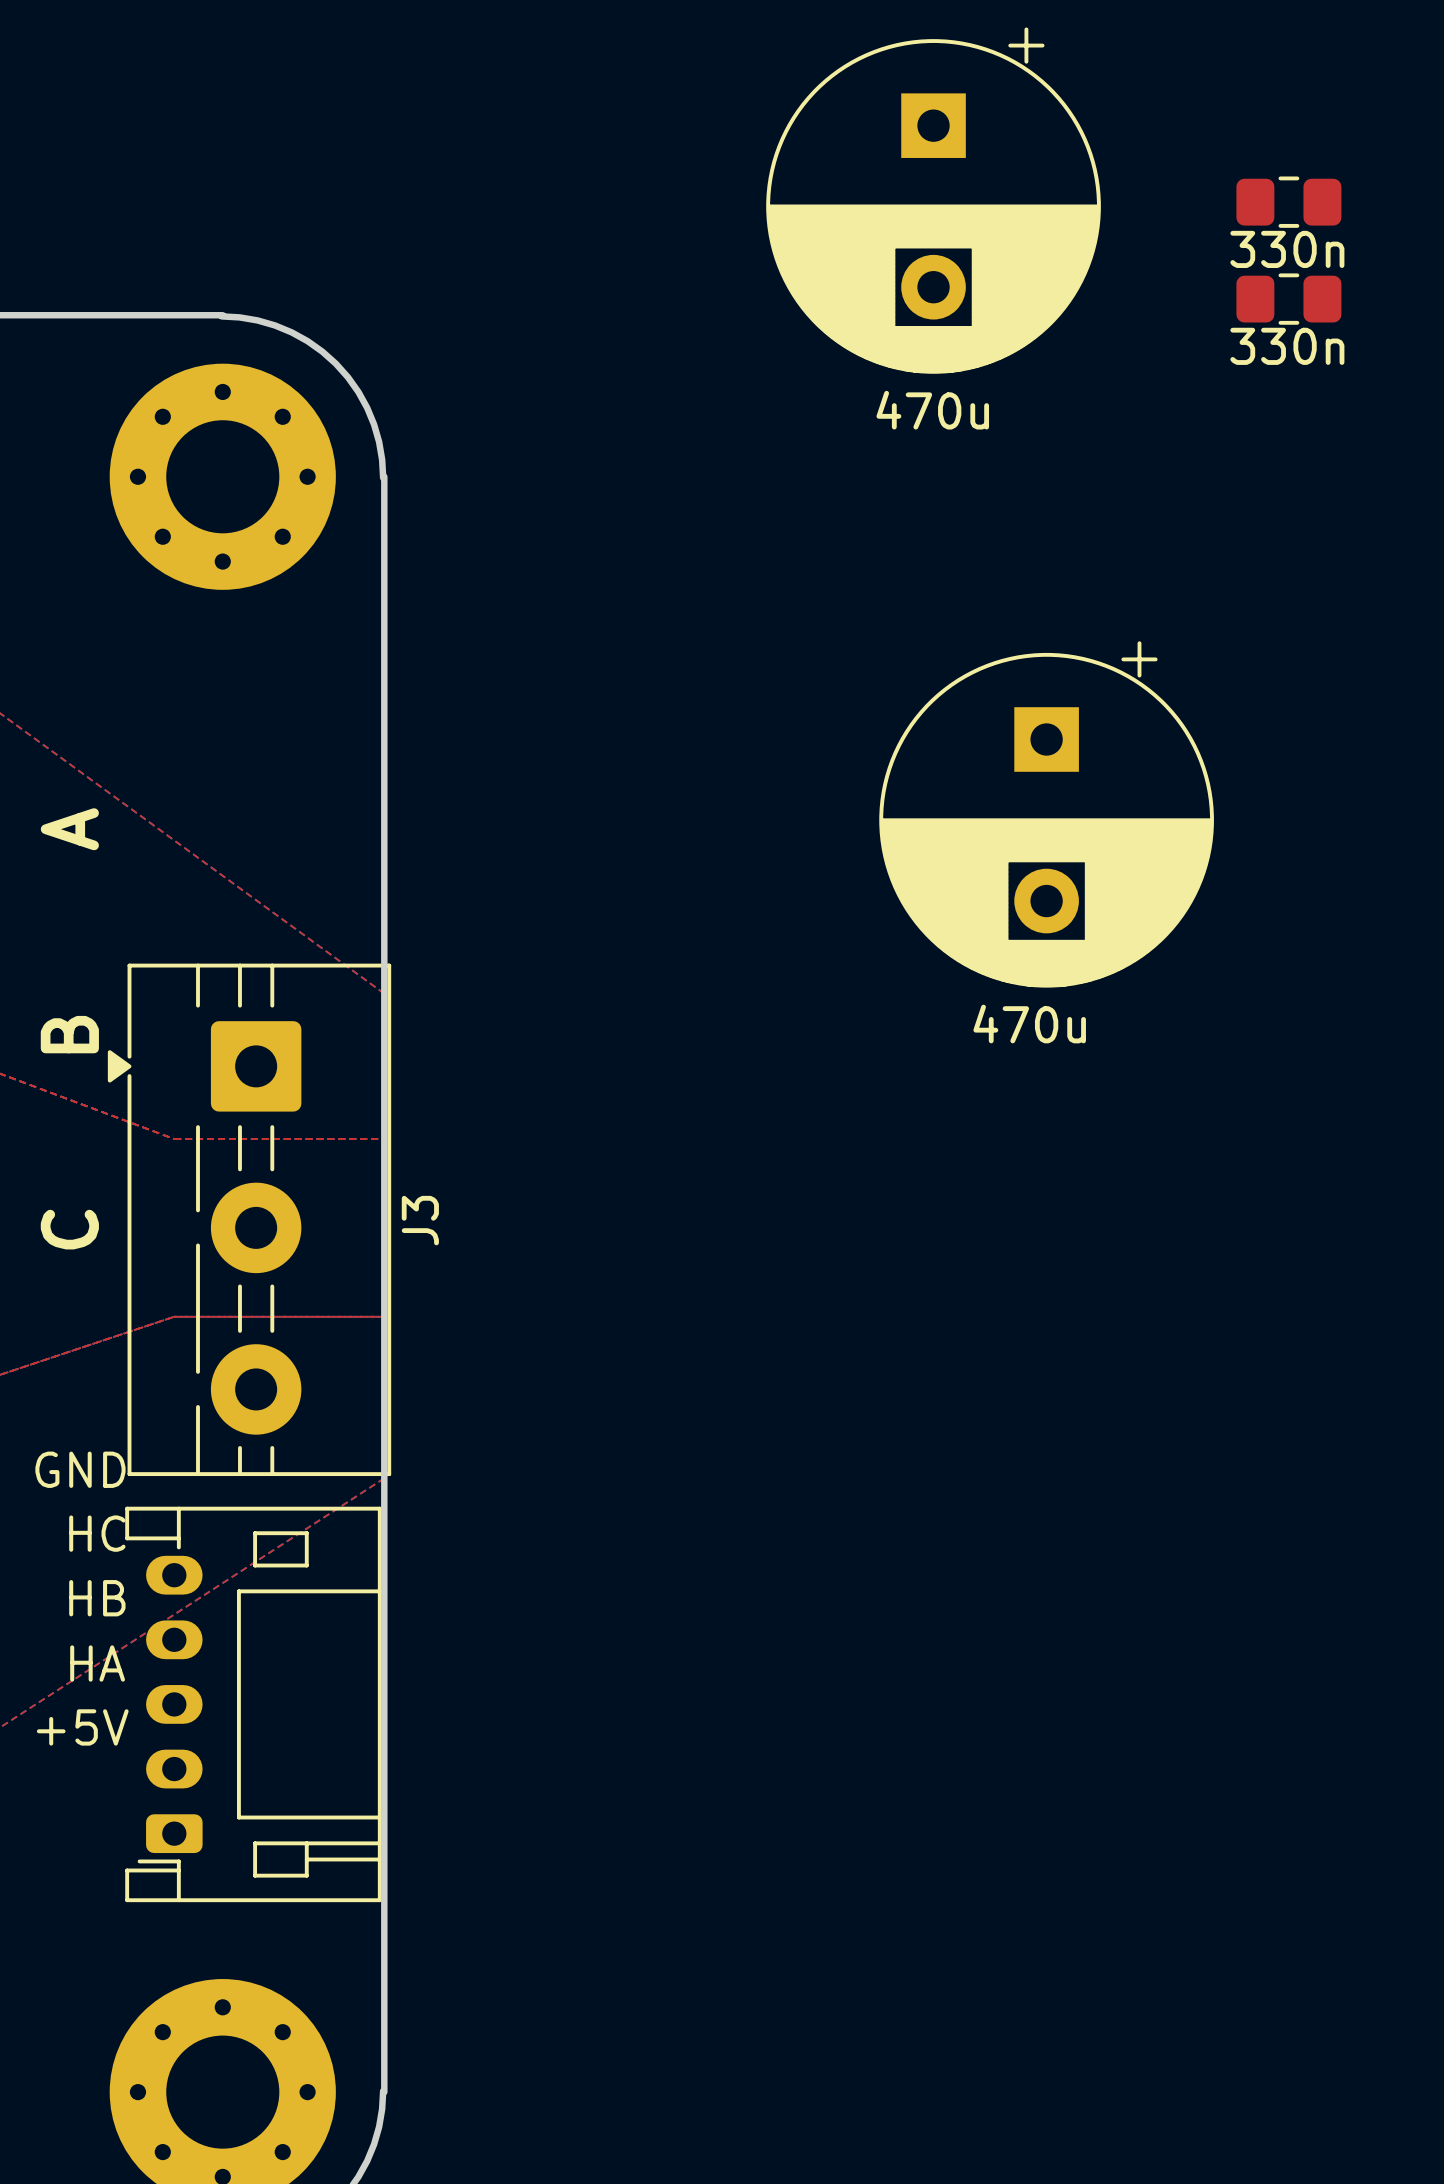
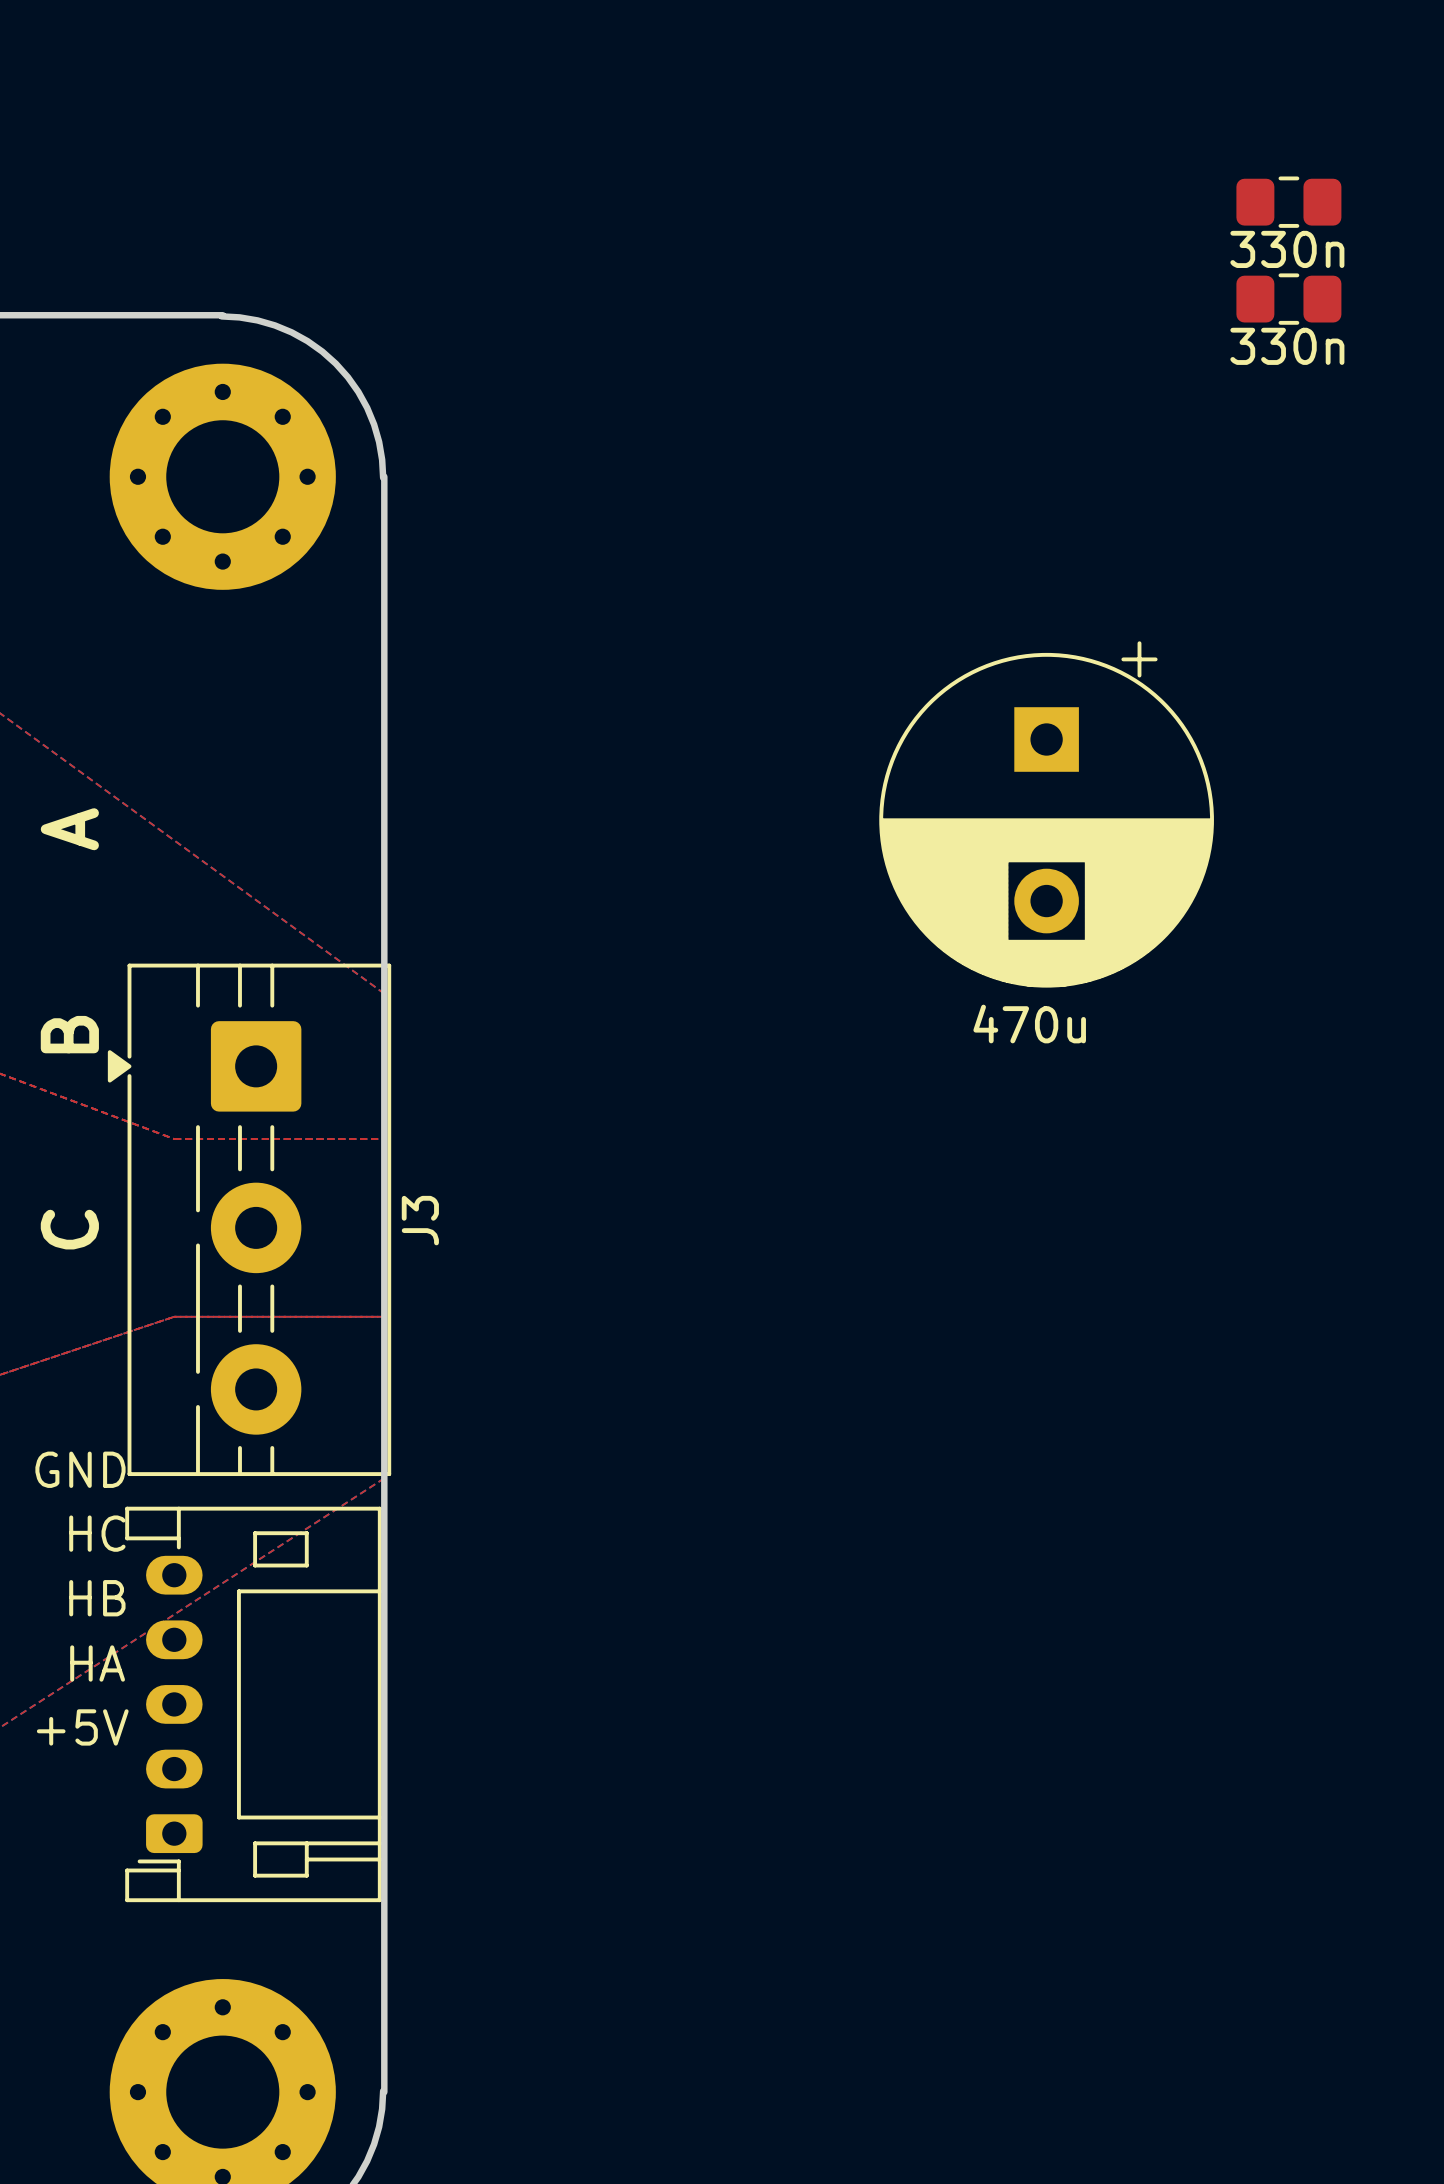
part: 470u (933, 200) -> none

